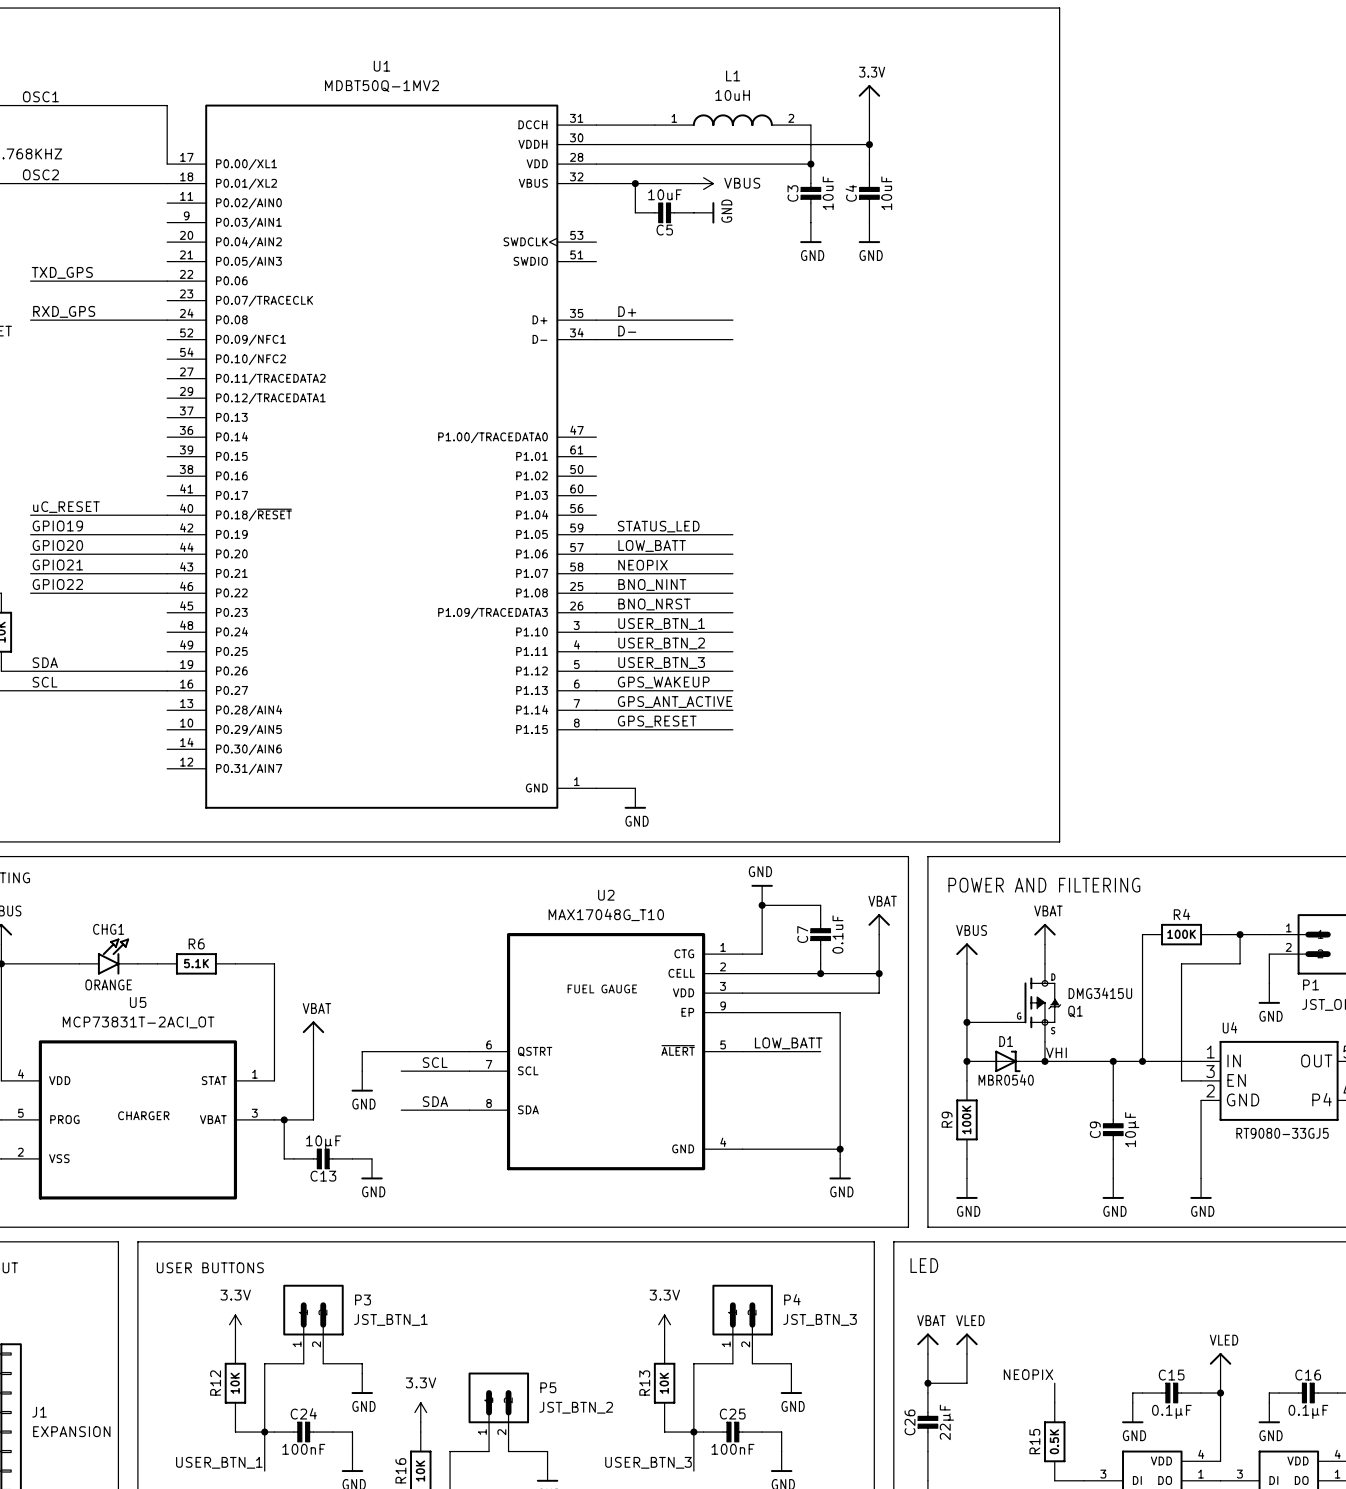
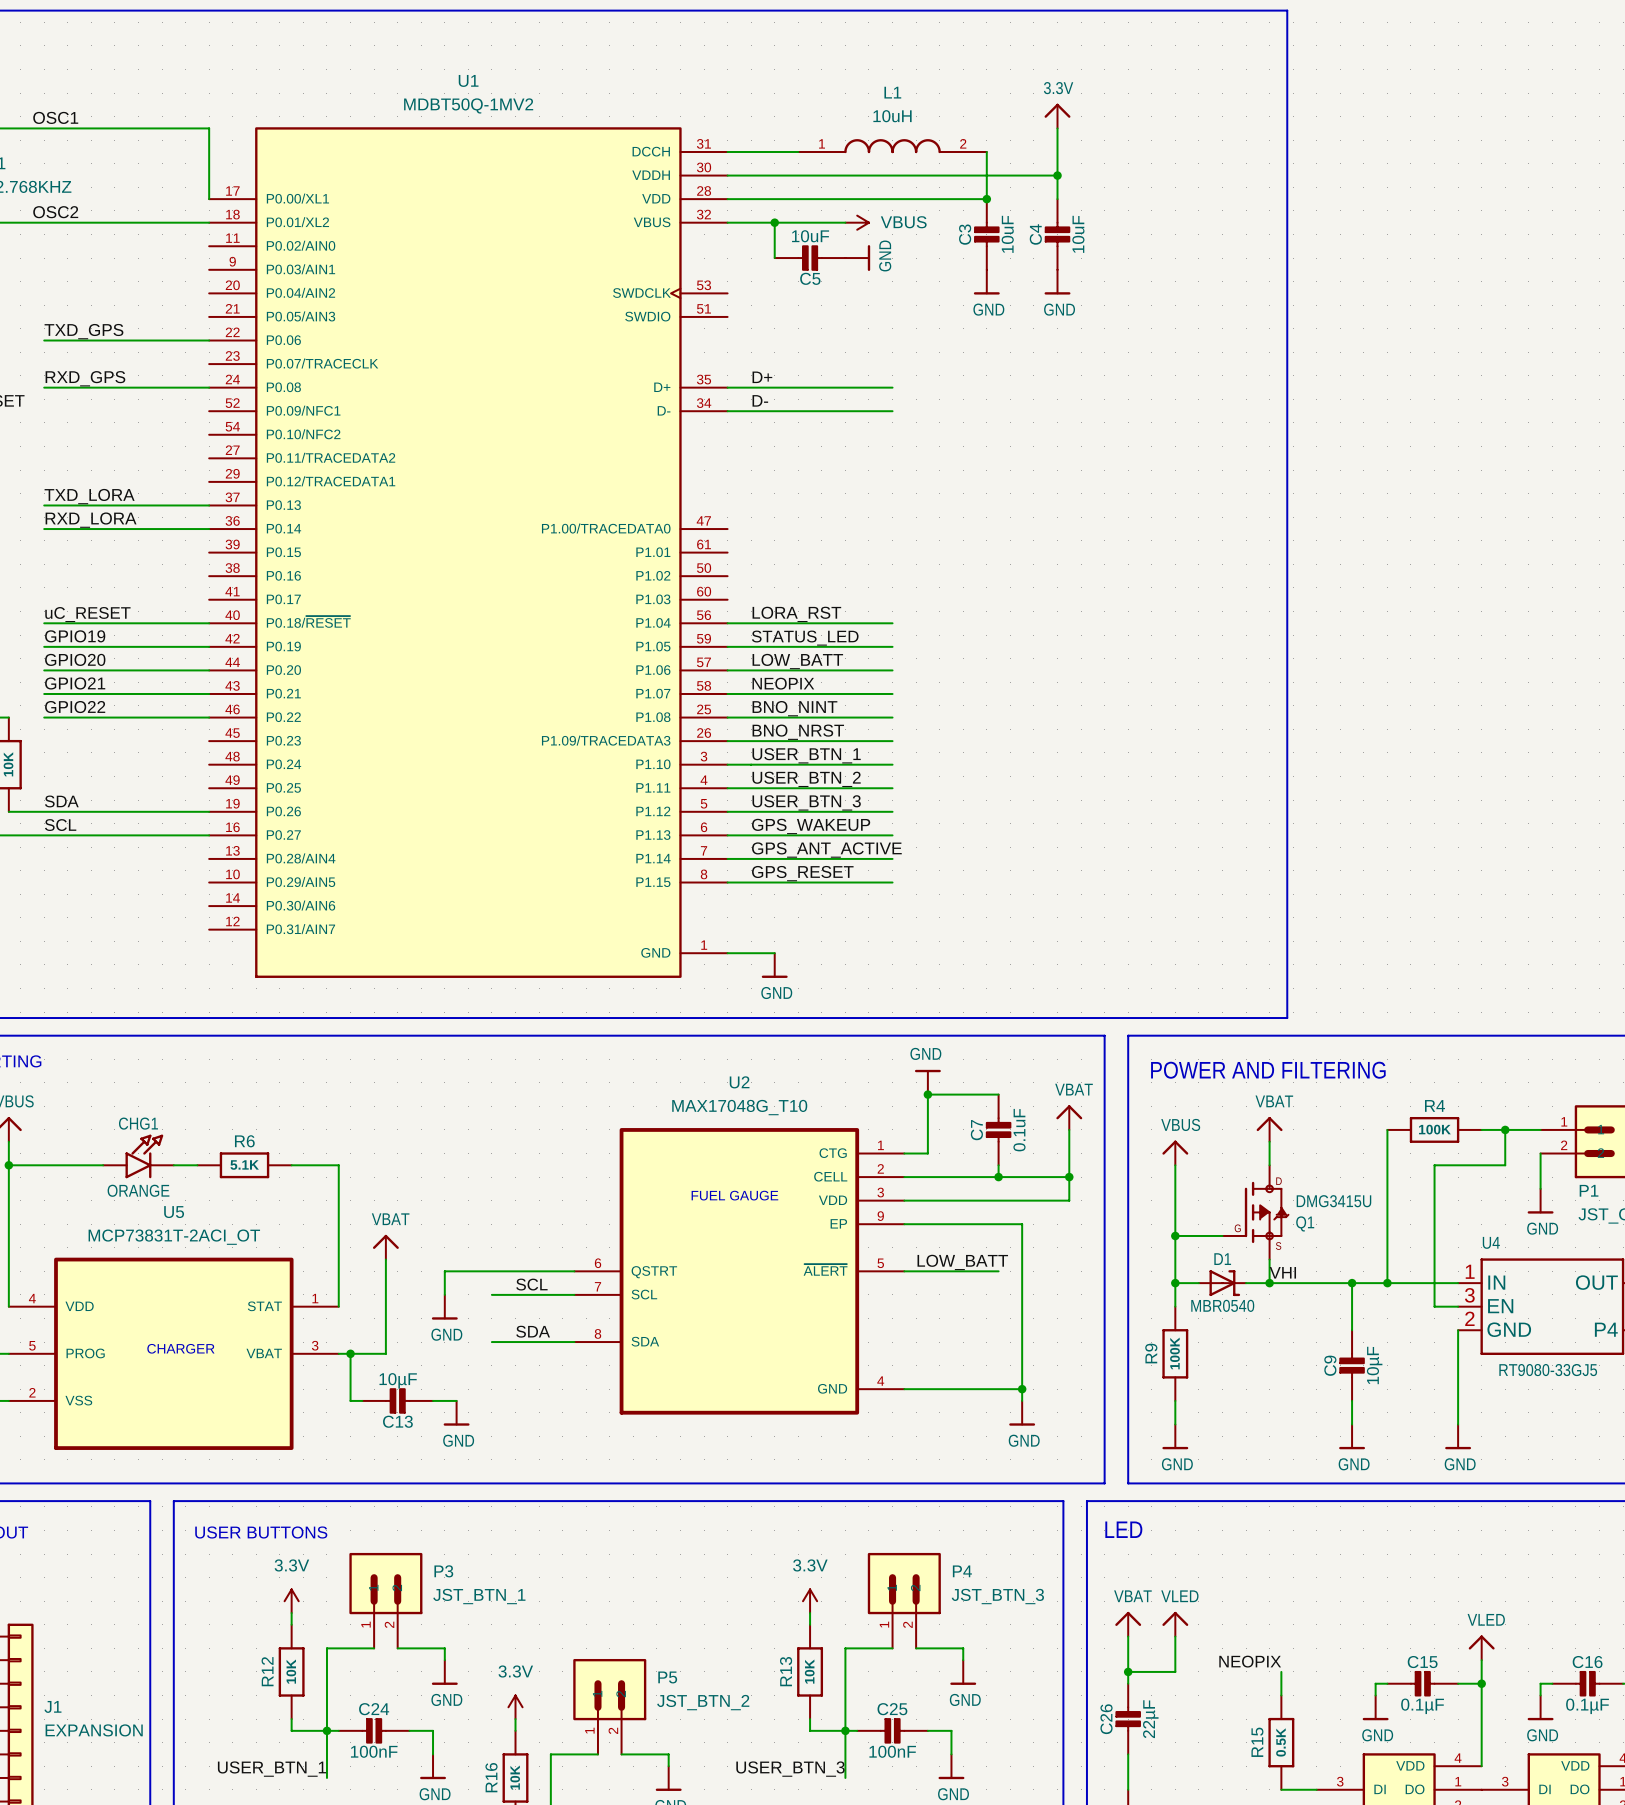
label: none -> TXD_LORA (89, 496)
wire: none -> (44, 505) (209, 505)
label: none -> RXD_LORA (91, 520)
wire: none -> (44, 529) (209, 529)
label: none -> LORA_RST (796, 614)
wire: none -> (727, 623) (892, 623)

